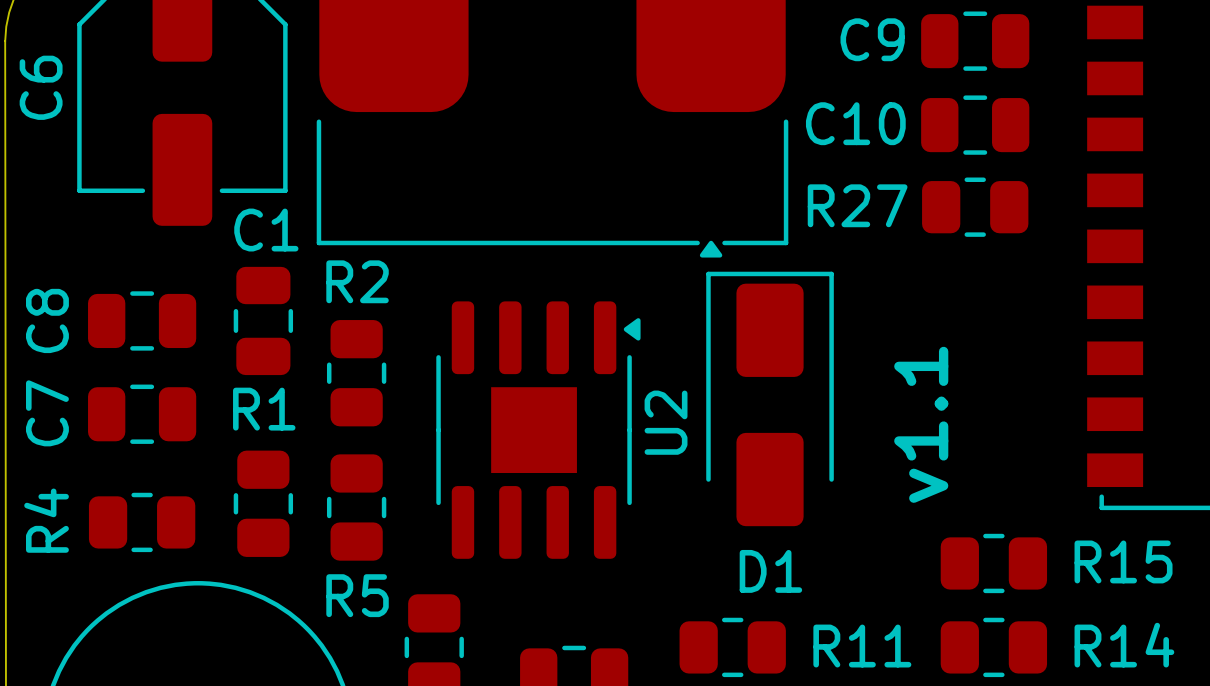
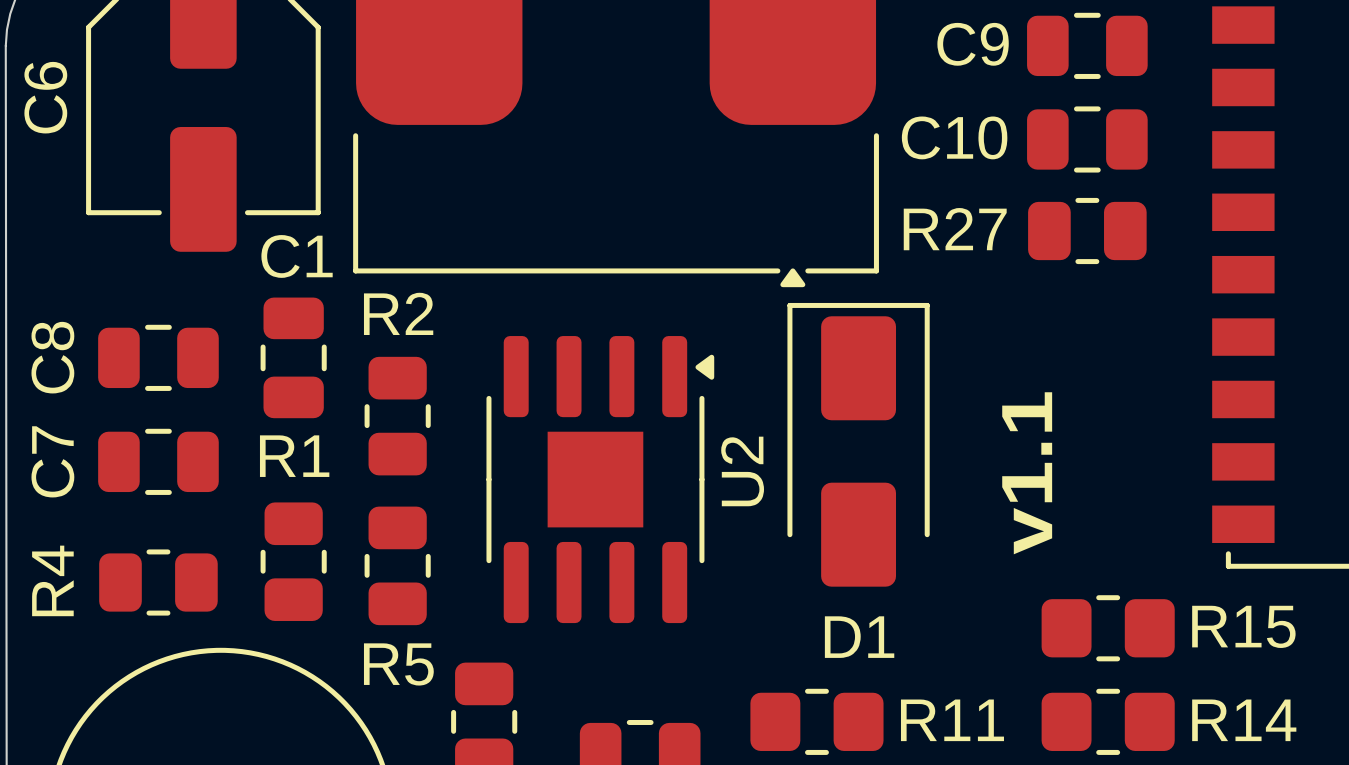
R15 footprint: [940, 533, 1048, 594] -> [1041, 595, 1175, 662]
R11 footprint: [679, 617, 786, 678] -> [750, 688, 884, 755]
R14 footprint: [940, 617, 1048, 678] -> [1041, 688, 1175, 755]

